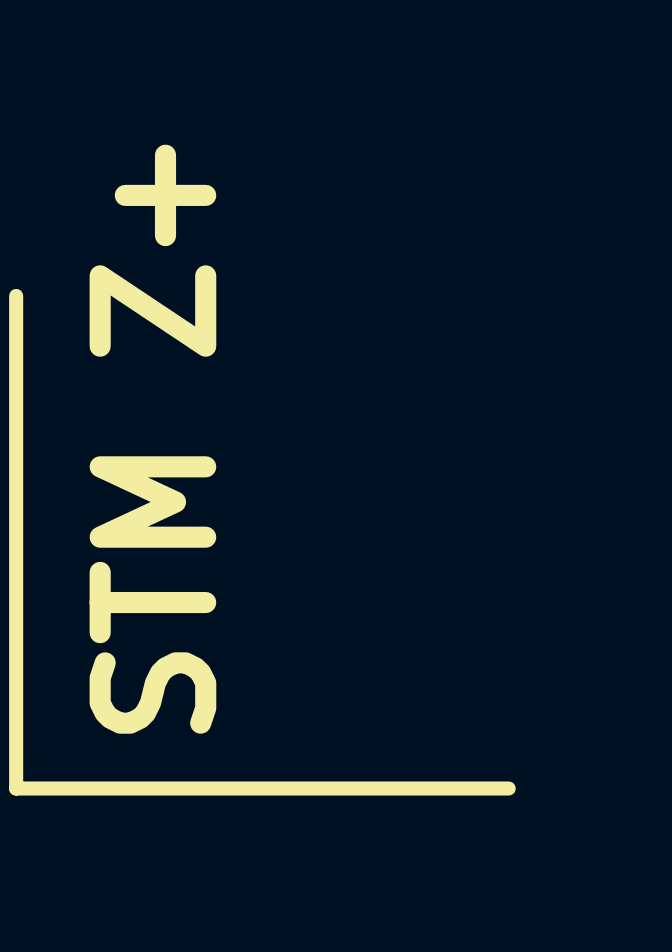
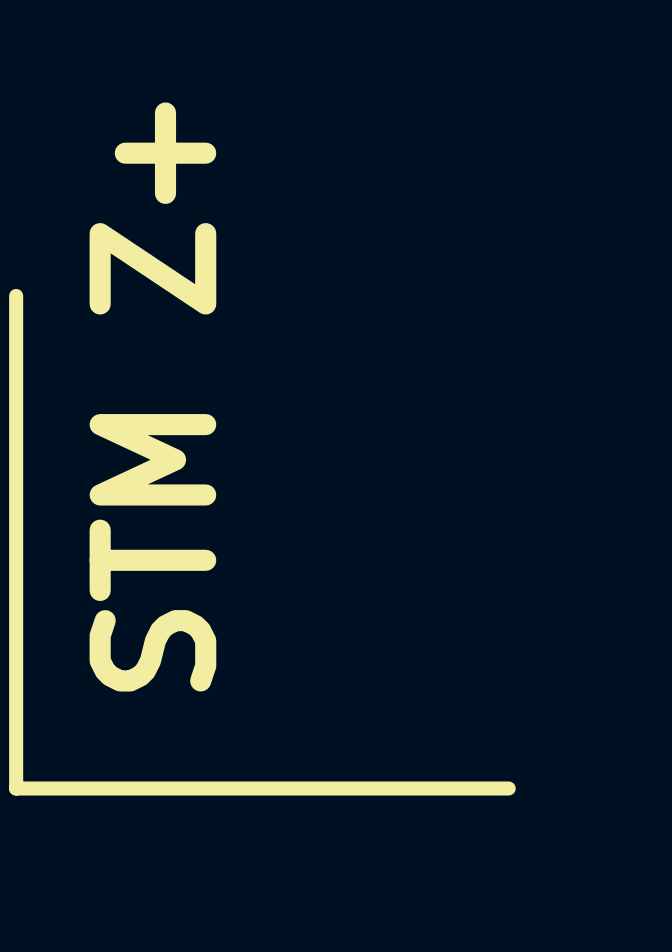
text position: STM Z+ (152, 439) -> STM Z+ (152, 396)

